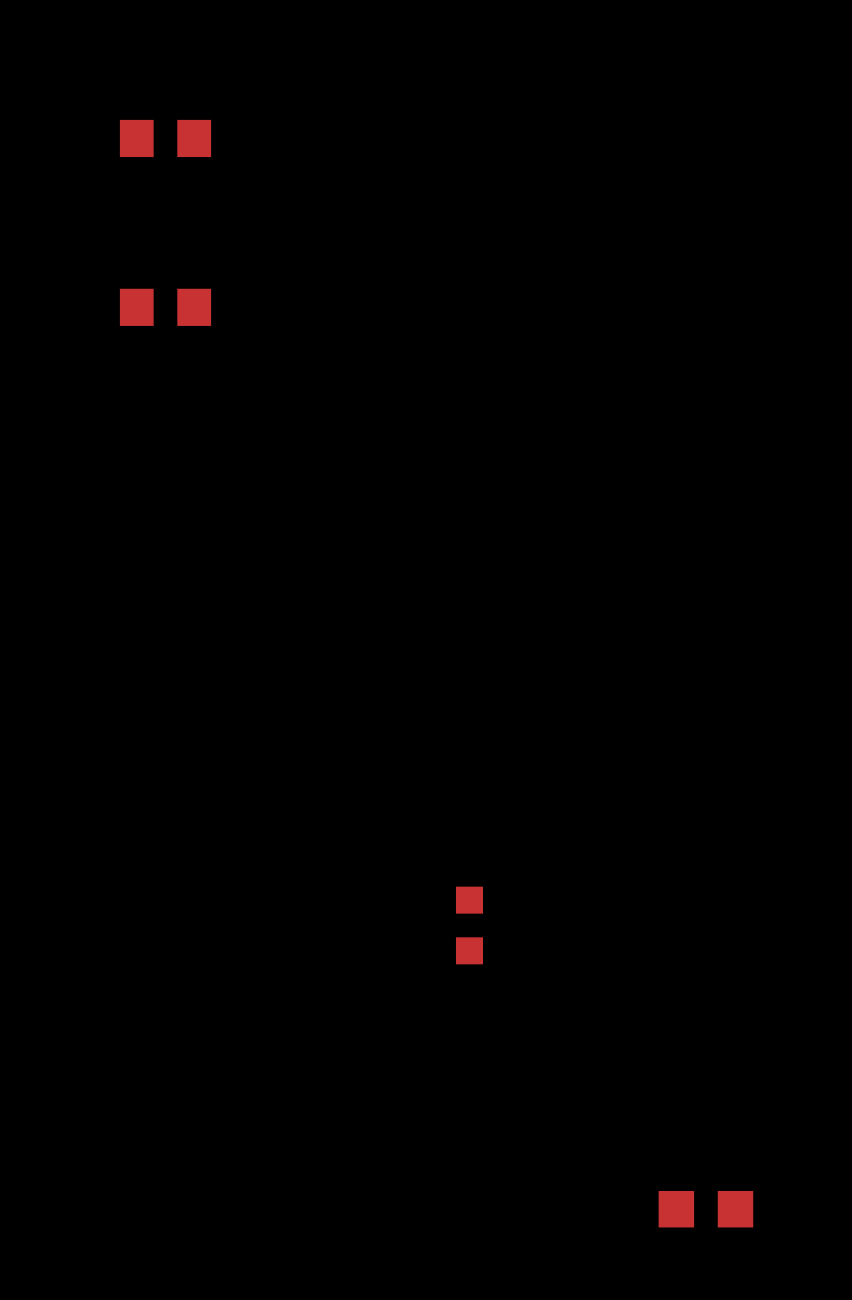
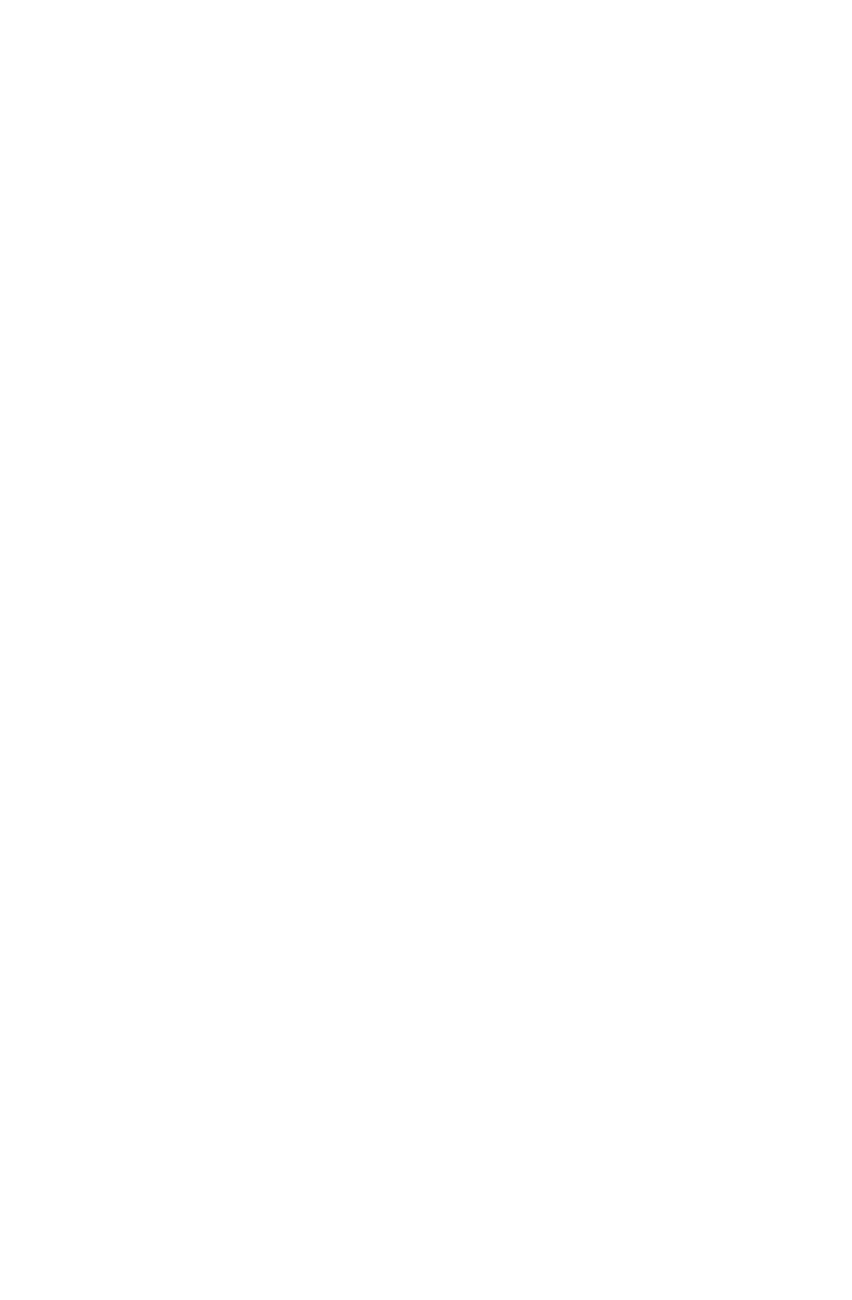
part: (165, 138) -> none
part: (165, 307) -> none
part: (469, 925) -> none
part: (705, 1209) -> none

